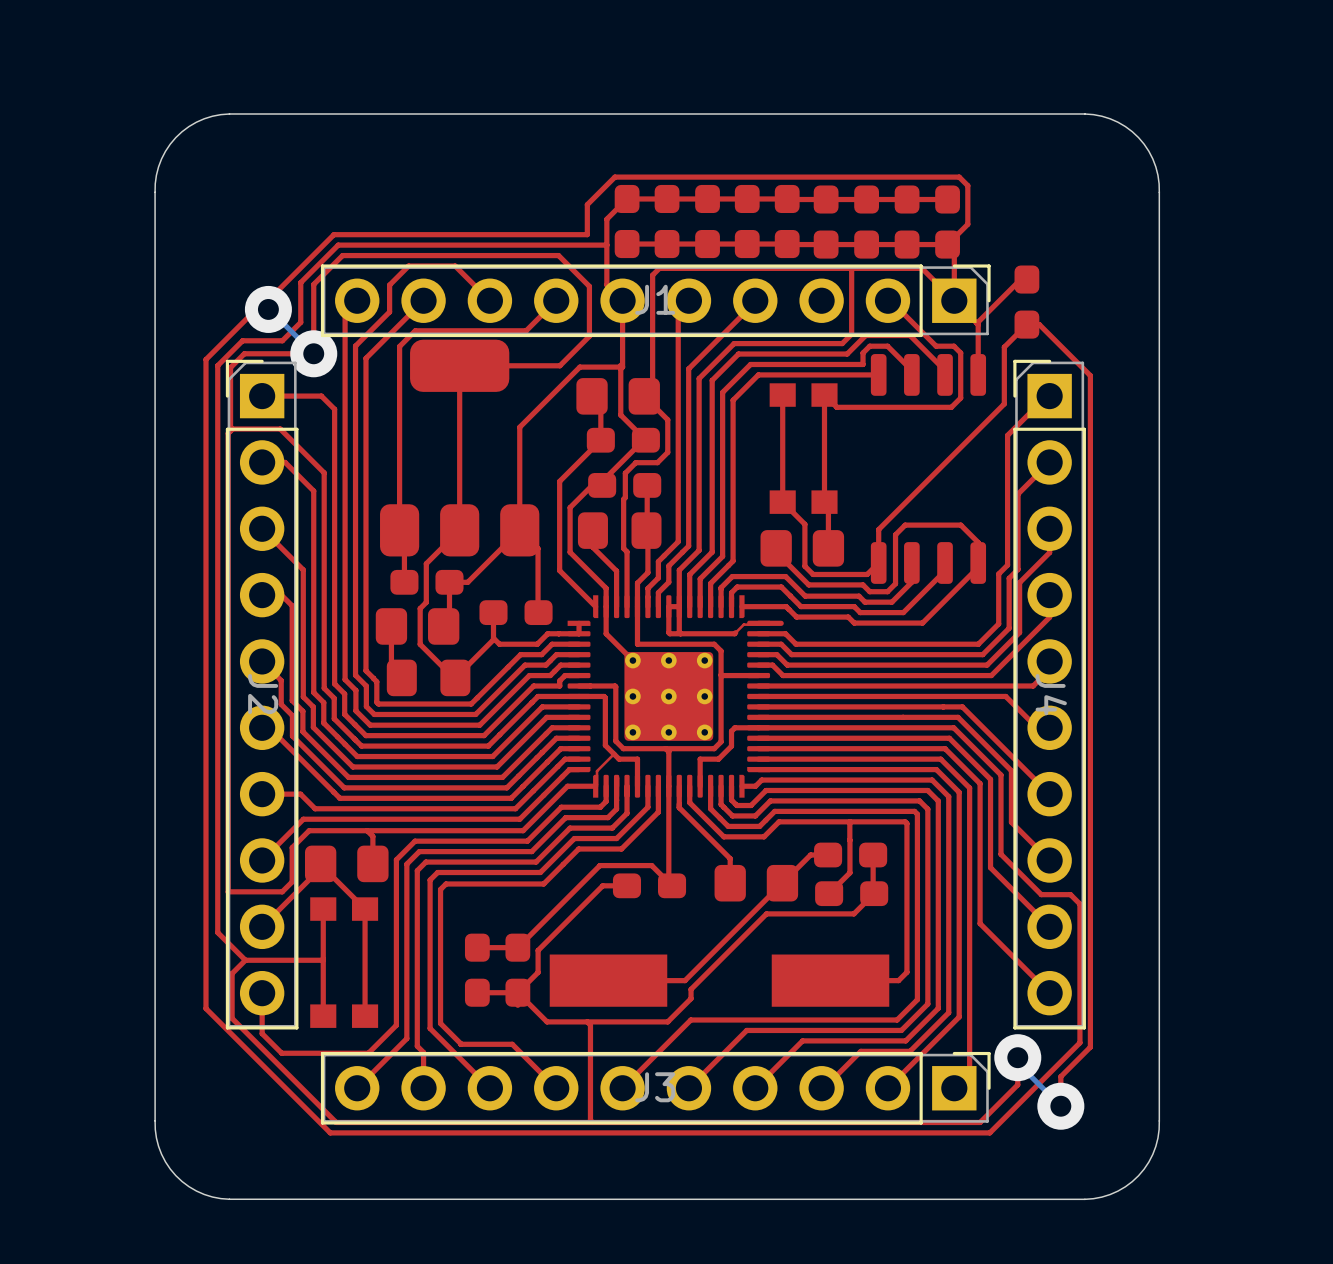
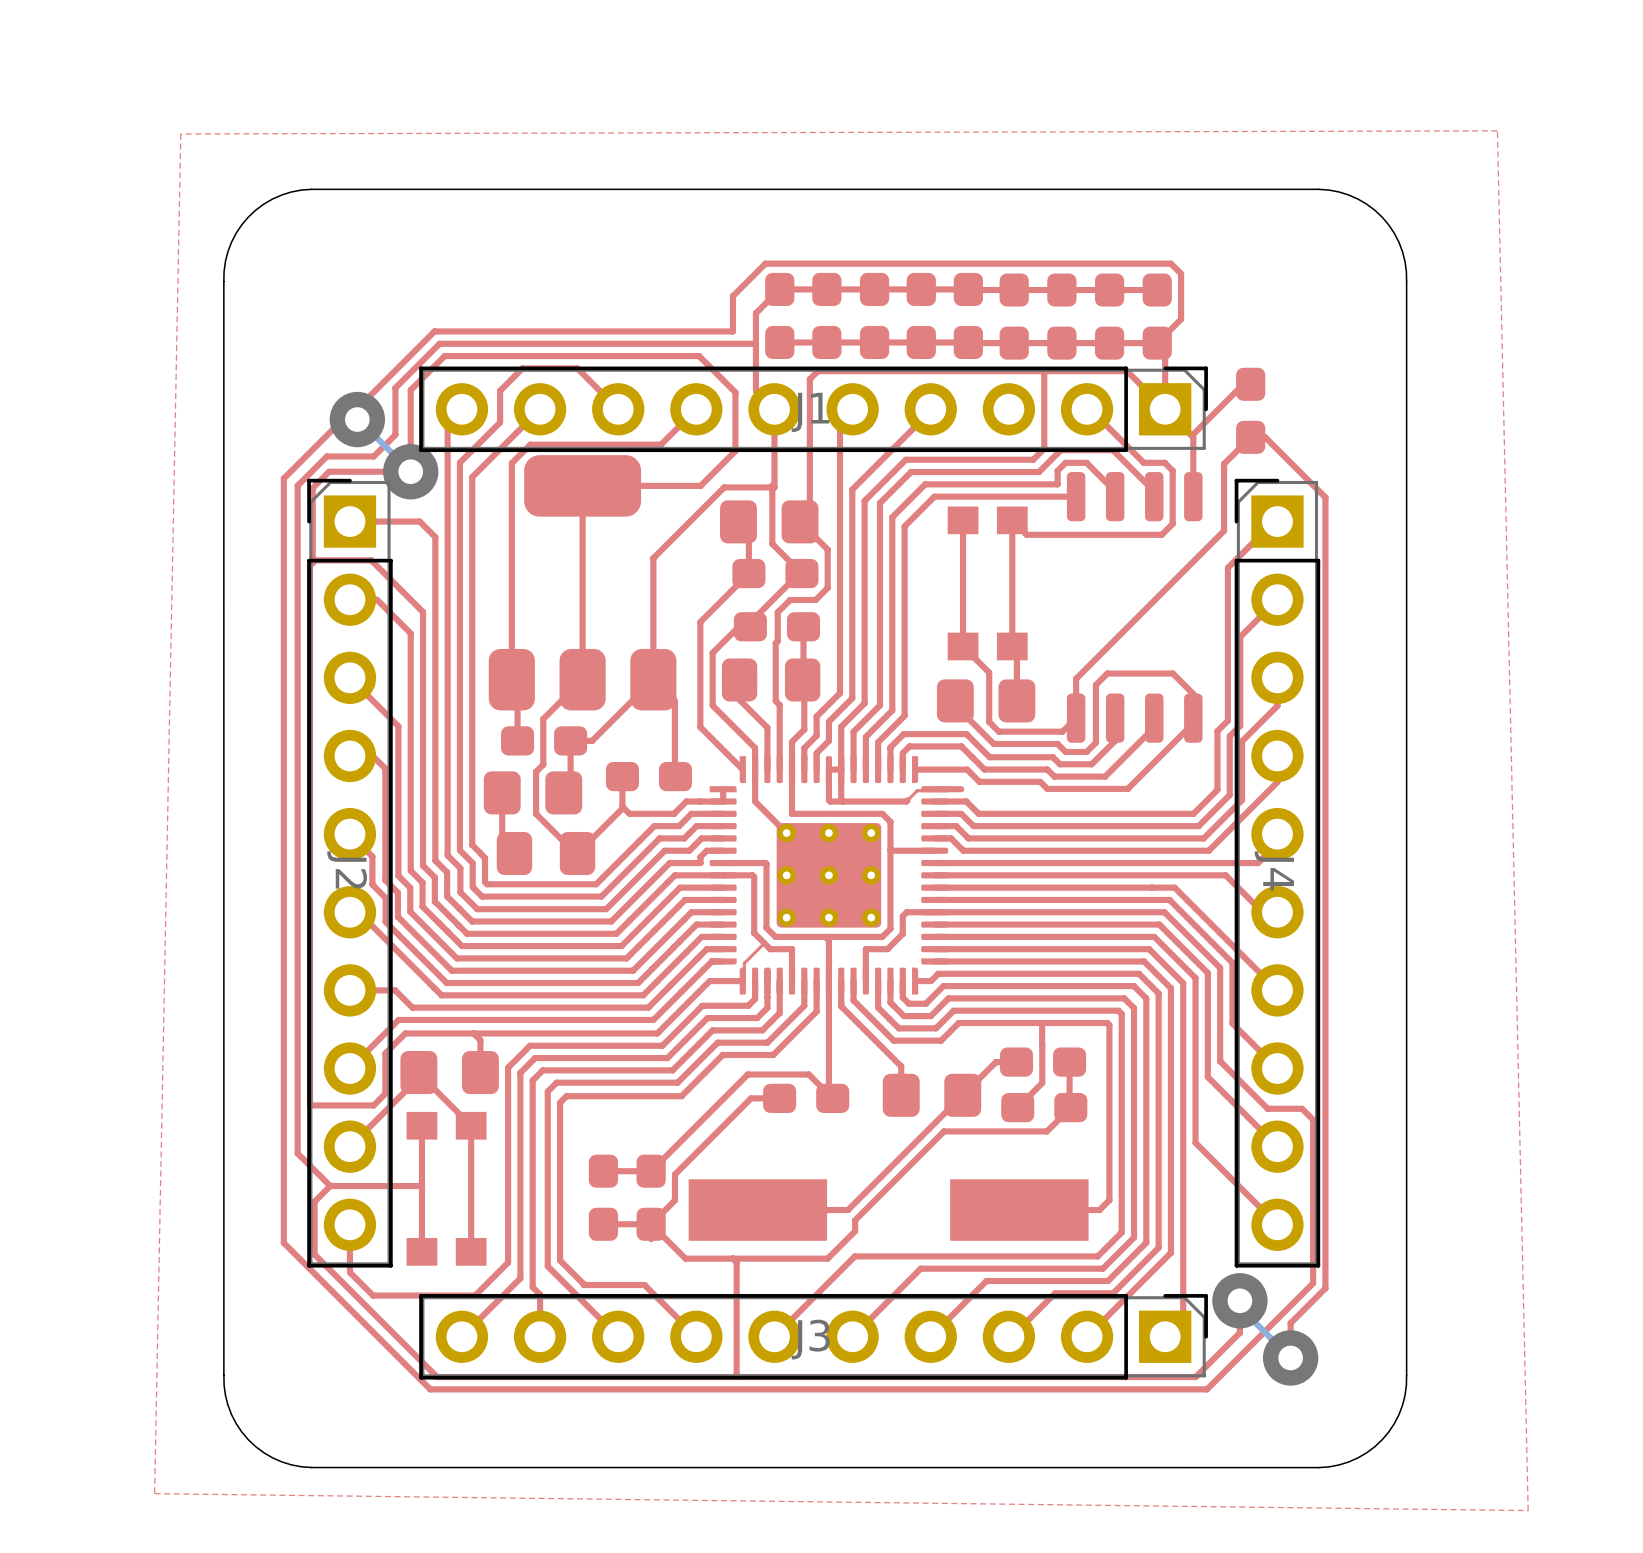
top zone outline: none -> (1497, 130) (180, 133) (154, 1493) (1528, 1510) (1497, 130)

